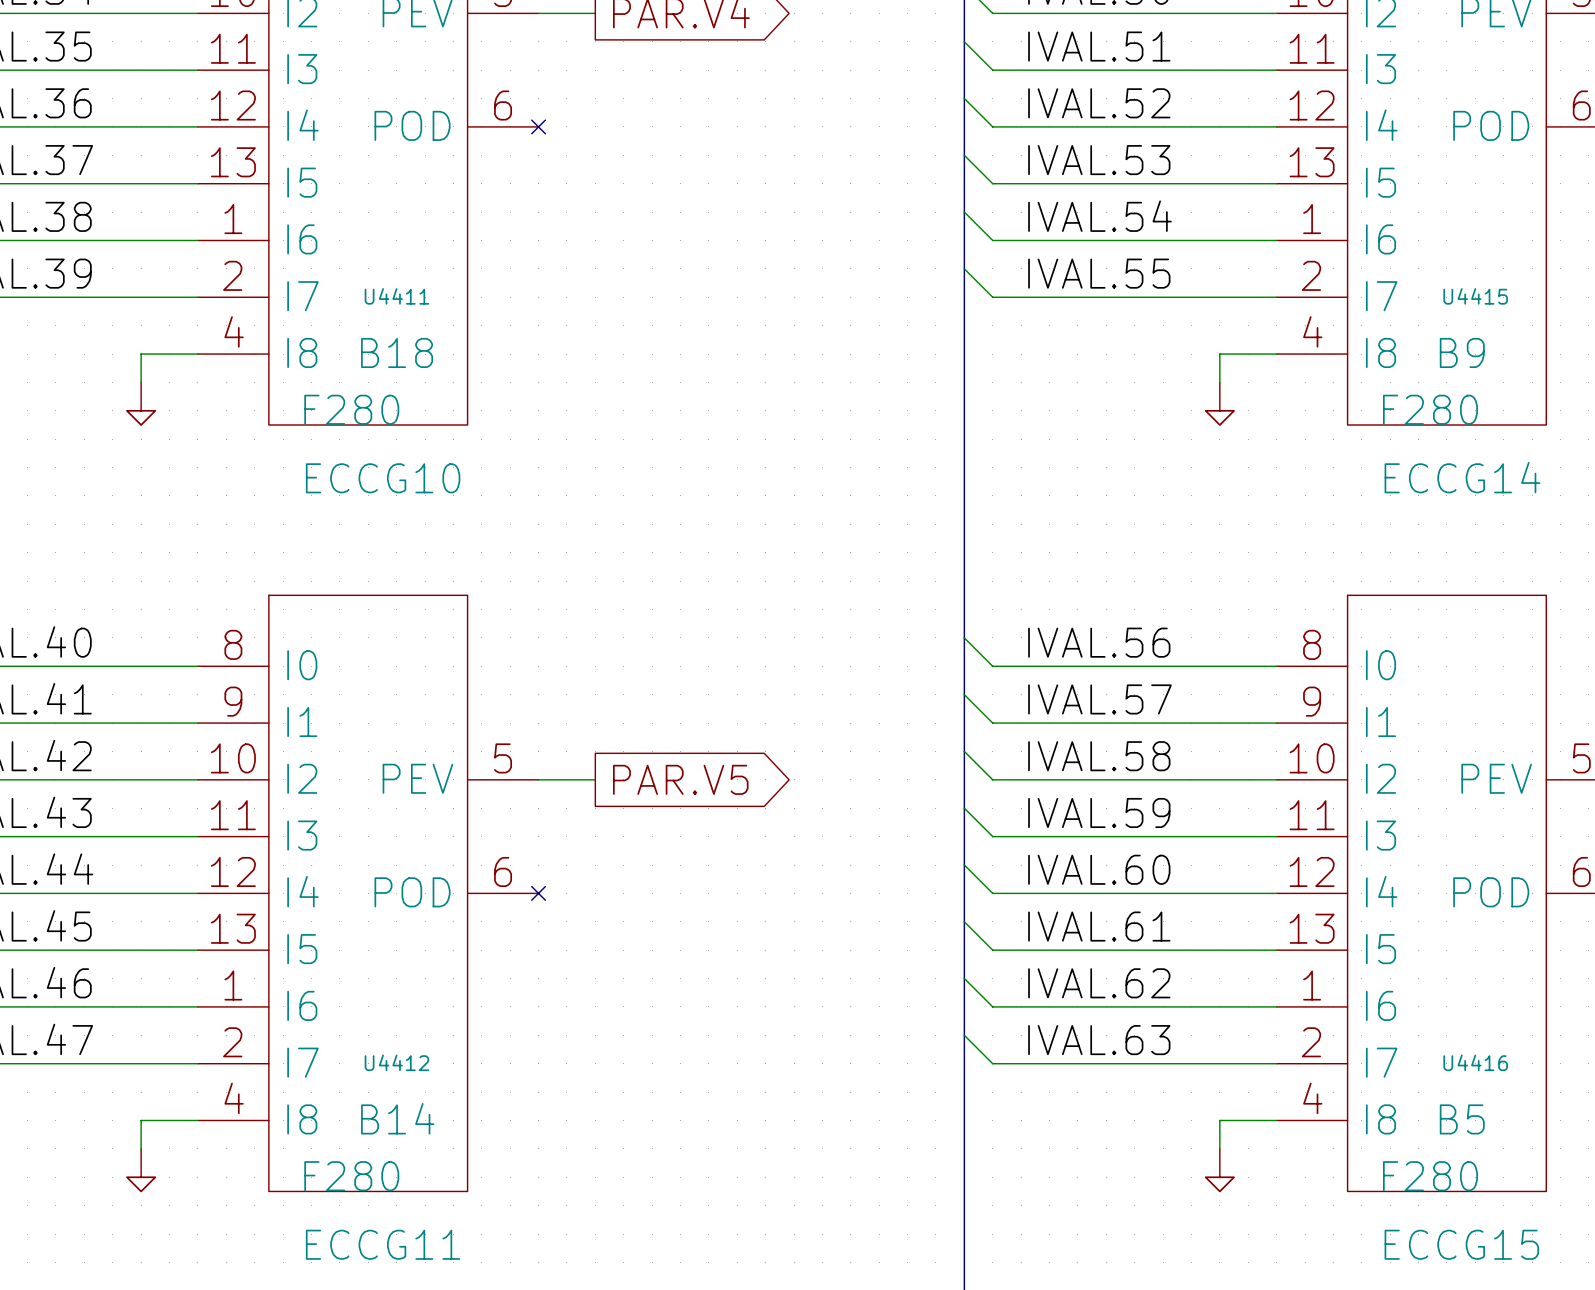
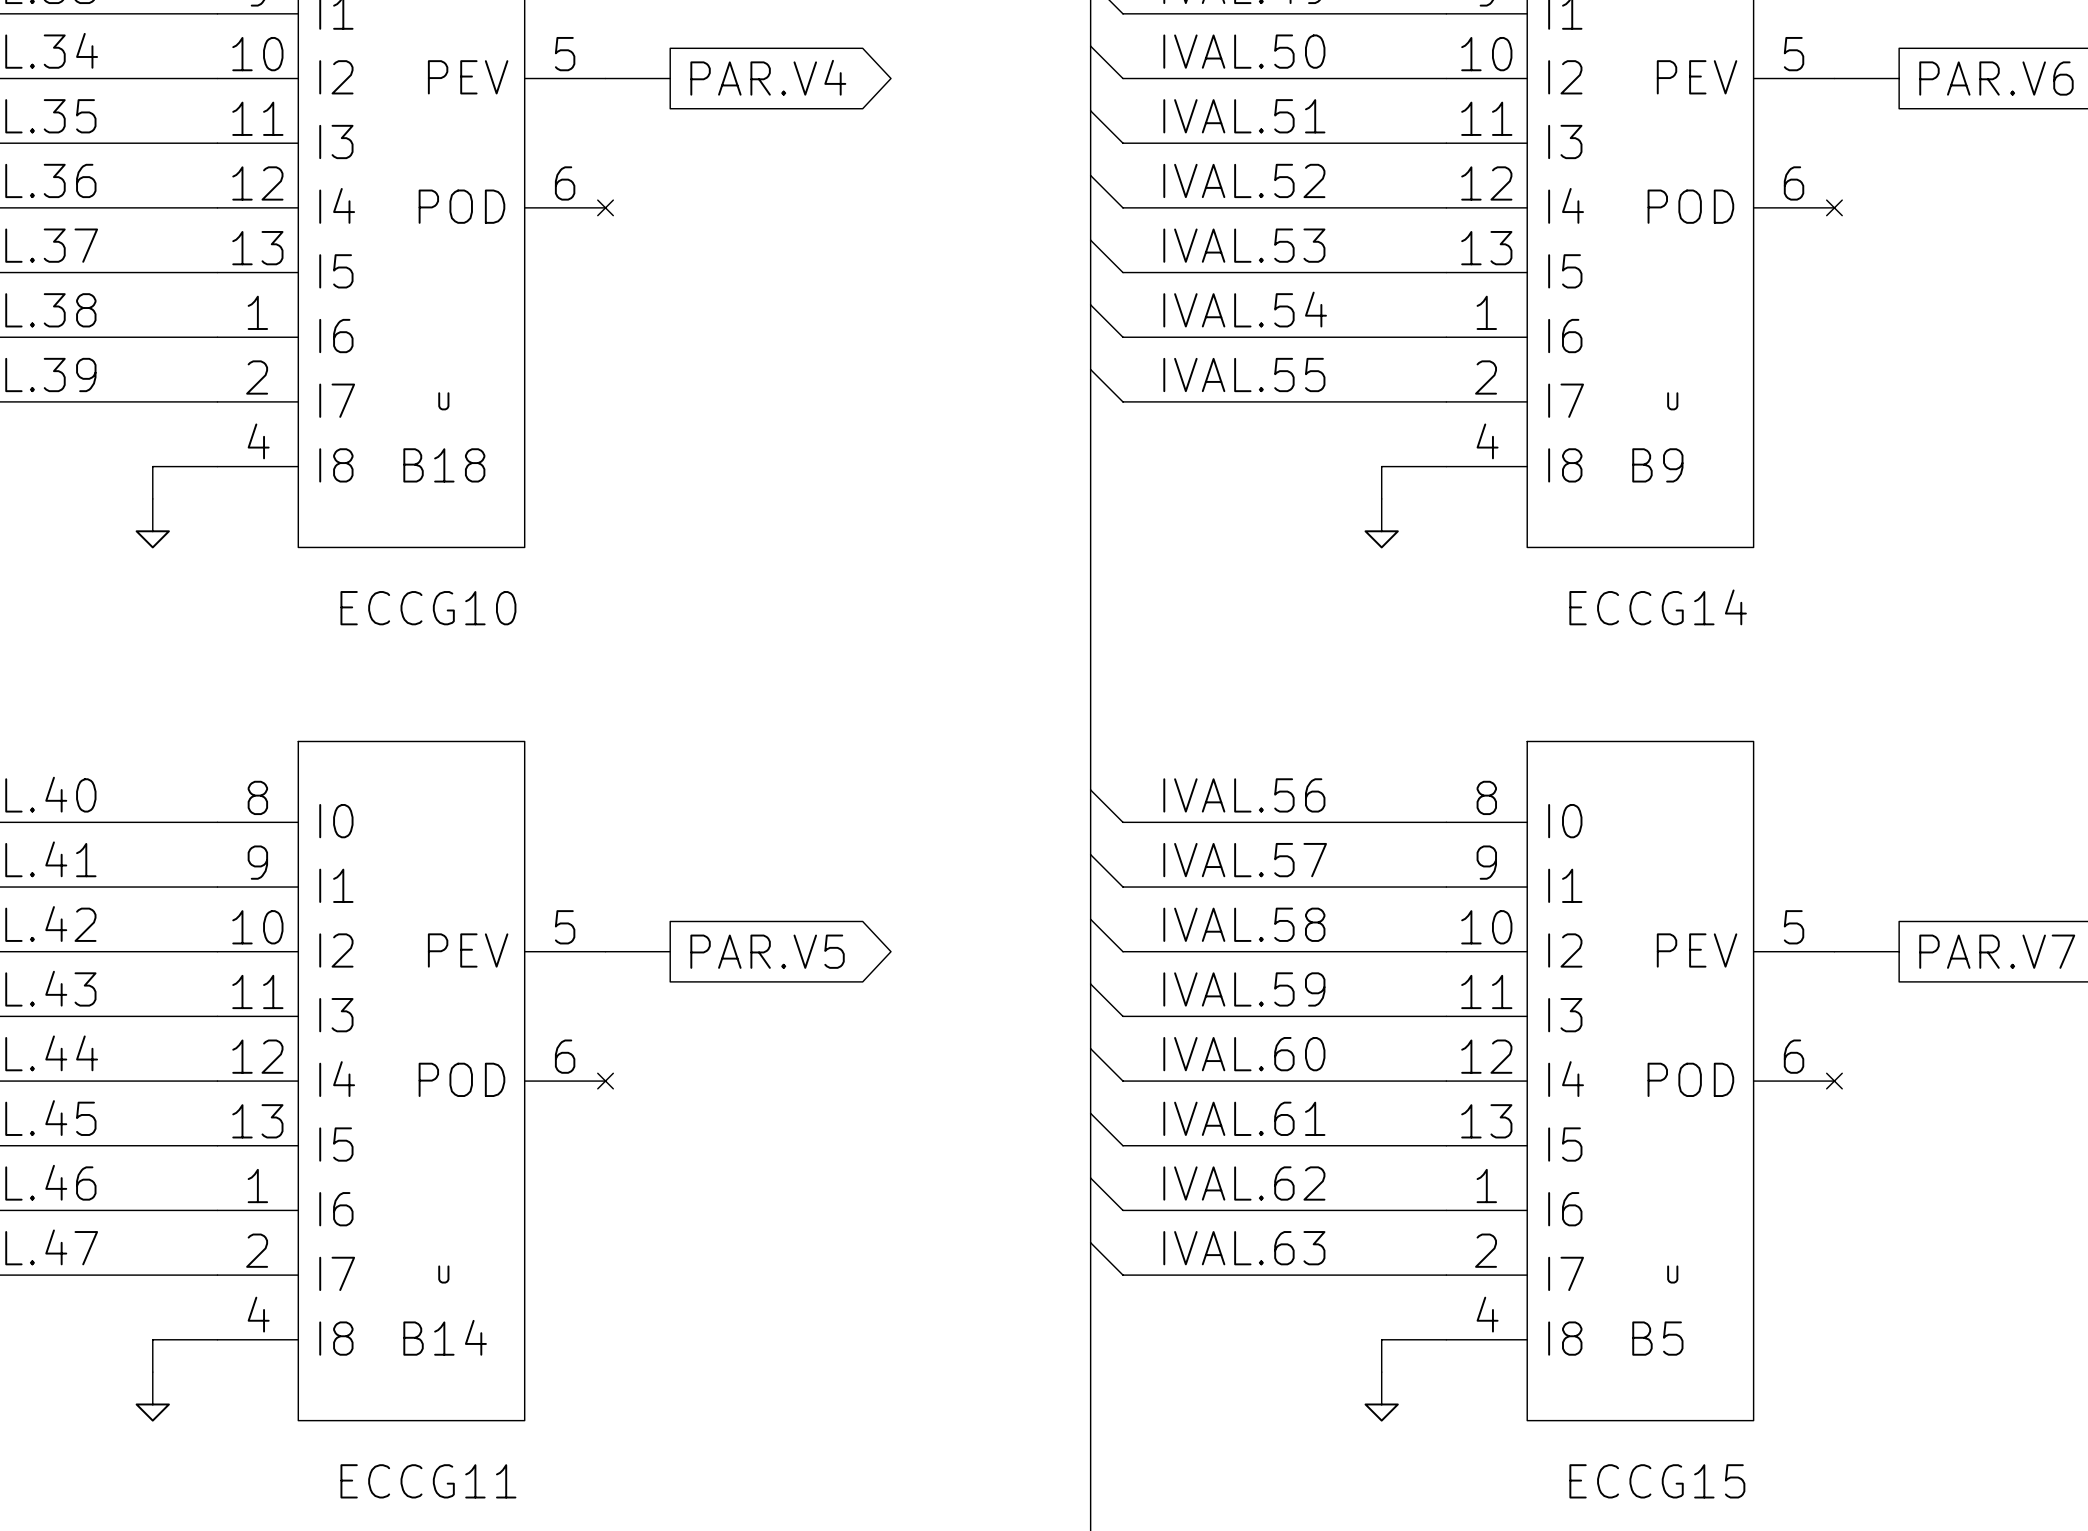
U4411 name: U4411 (396, 296) -> U (443, 401)
U4415 name: U4415 (1475, 296) -> U (1672, 401)
U4411 value: F280 (351, 409) -> none
U4415 value: F280 (1430, 409) -> none
U4412 name: U4412 (396, 1062) -> U (443, 1274)
U4416 name: U4416 (1475, 1062) -> U (1672, 1274)
U4412 value: F280 (351, 1176) -> none
U4416 value: F280 (1430, 1176) -> none

